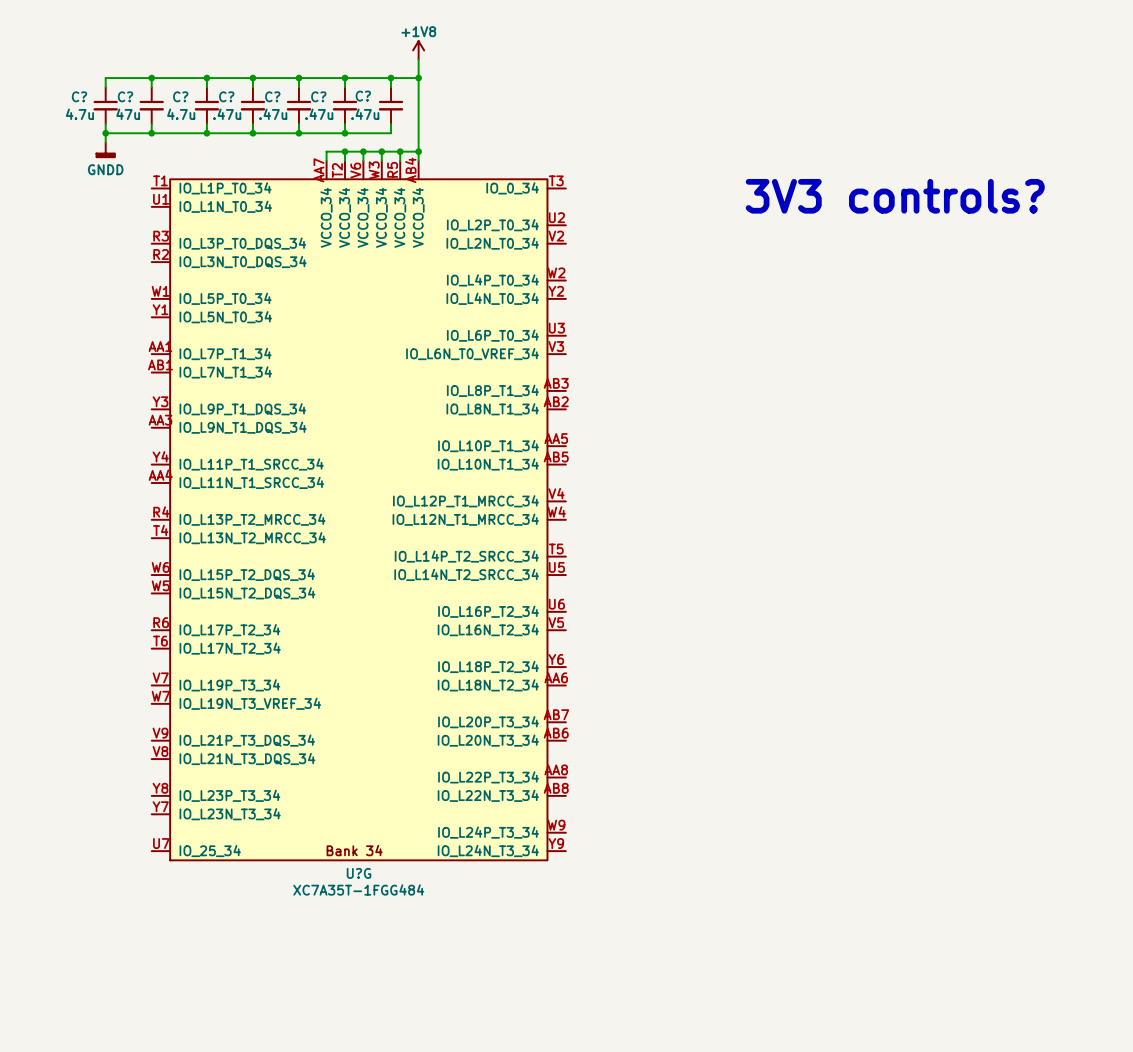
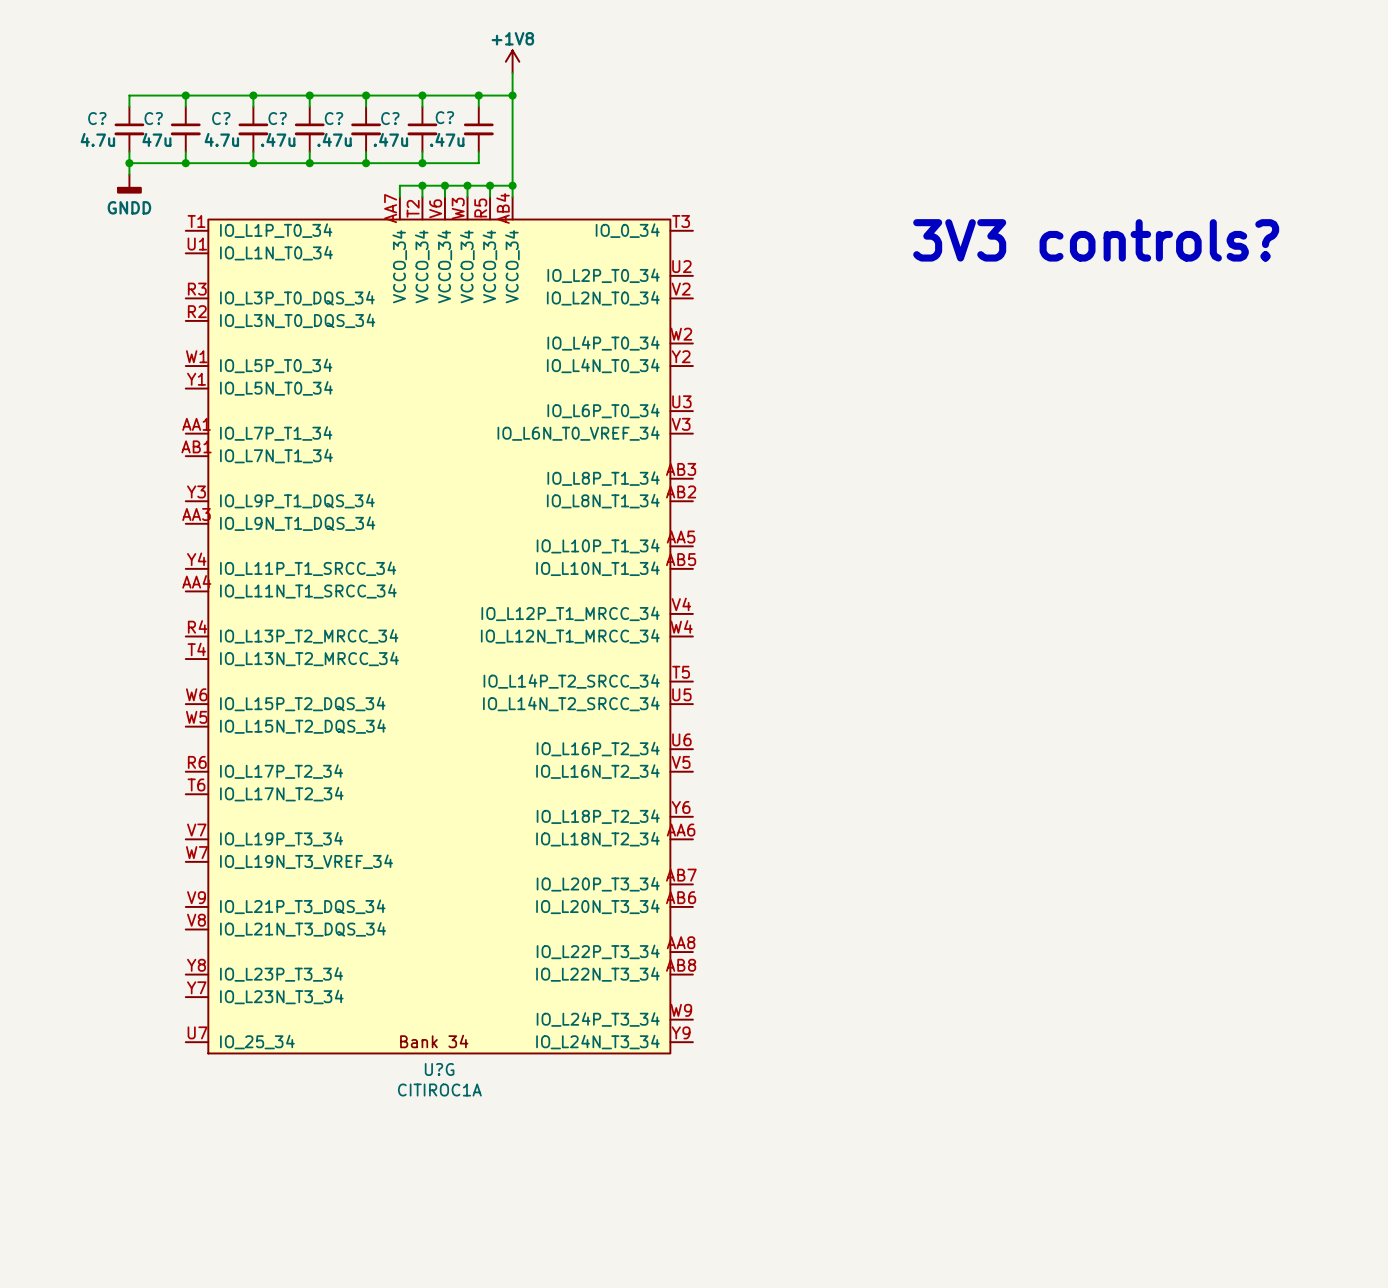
U?G value: XC7A35T-1FGG484 (358, 889) -> CITIROC1A (439, 1090)

